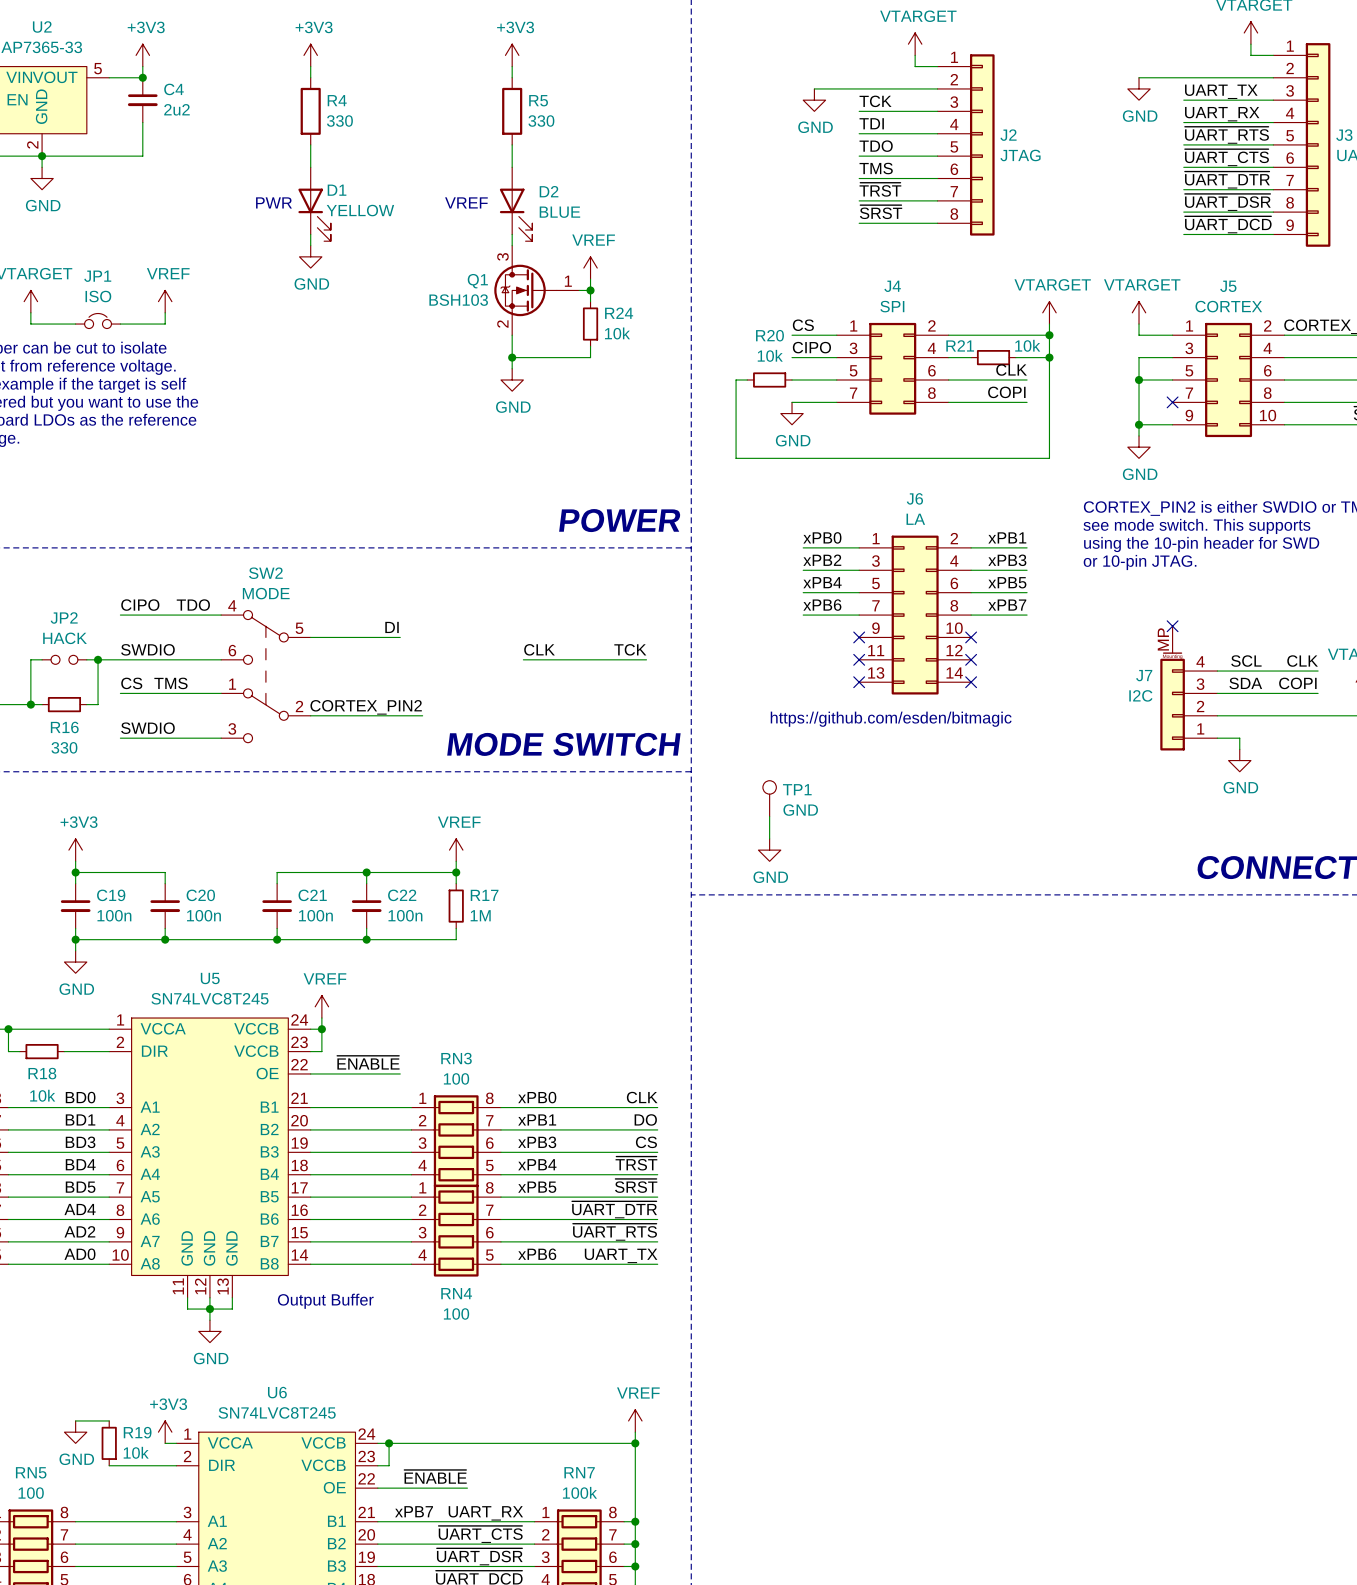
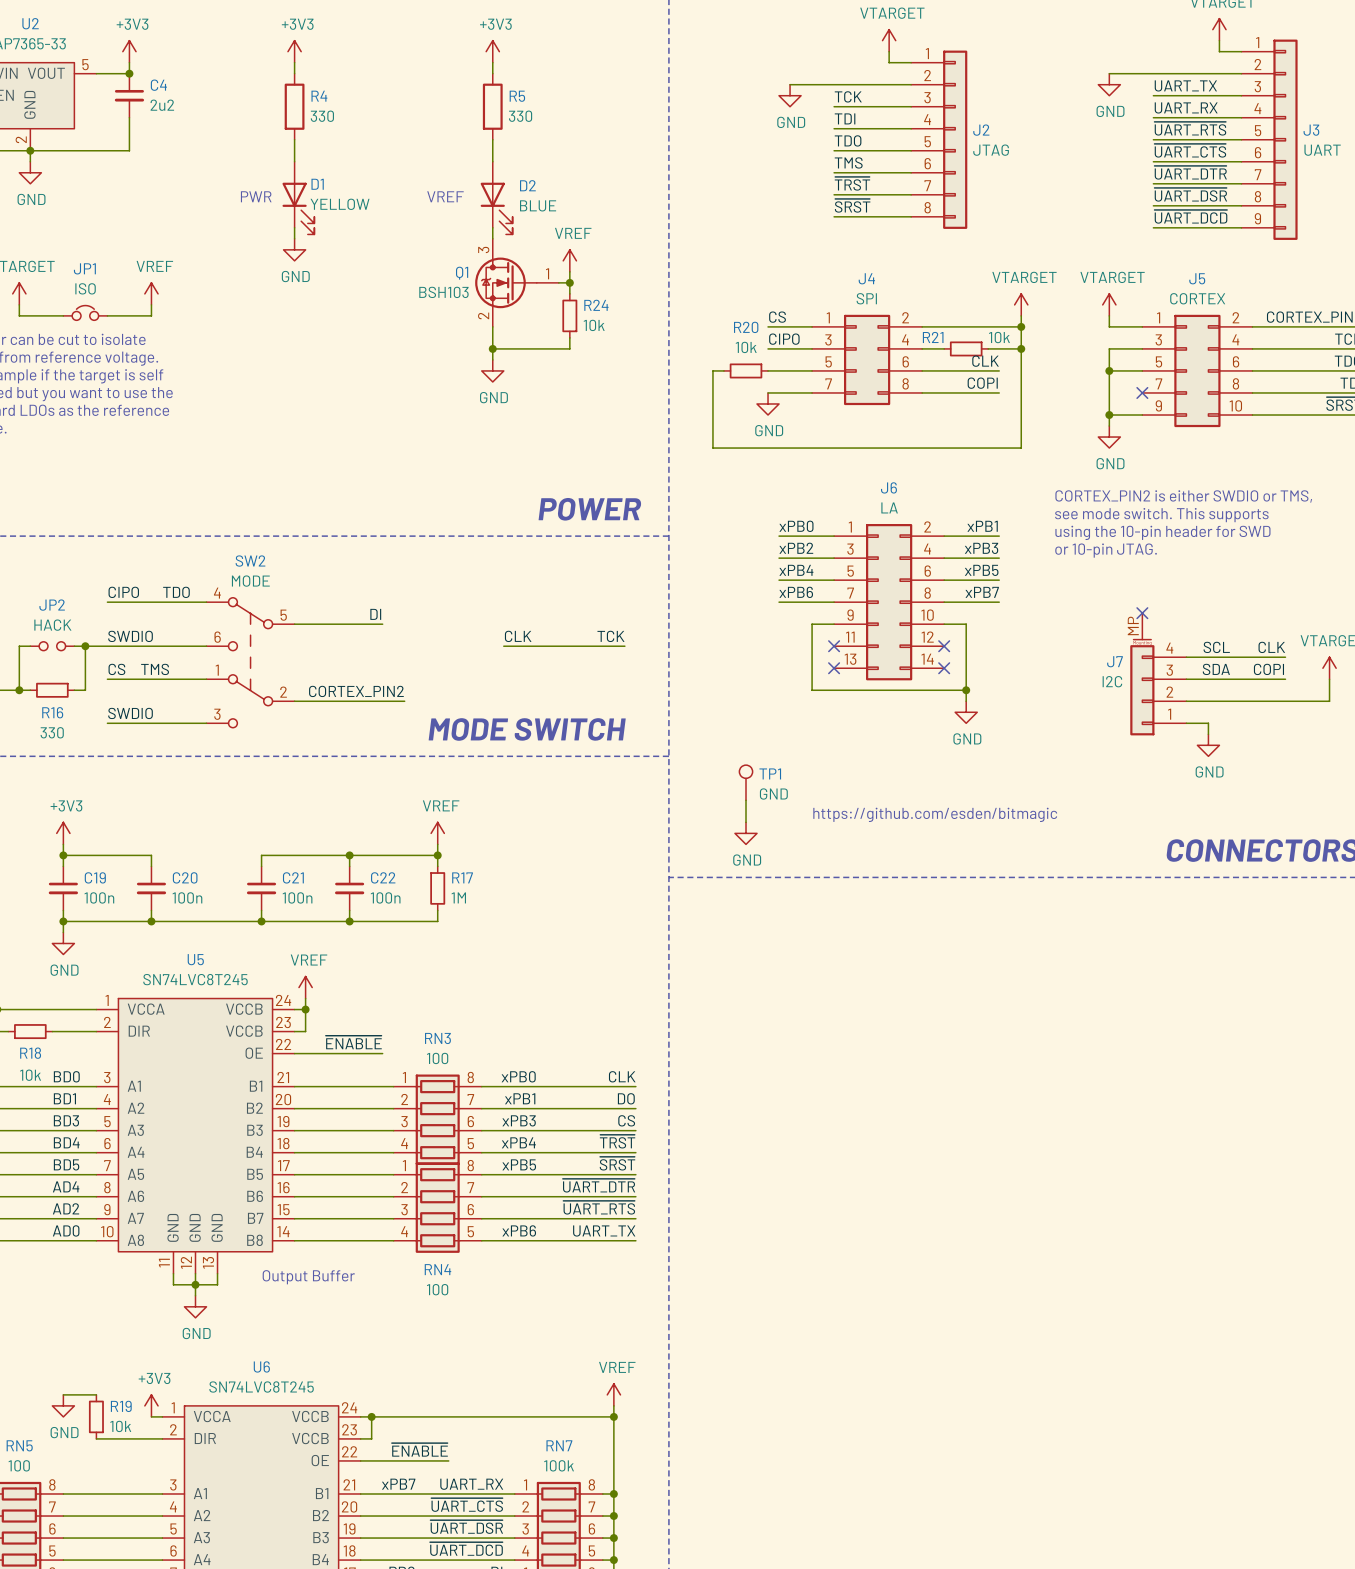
wire: none -> (834, 624) (812, 624) (812, 690) (966, 690)
no-connect mark: (859, 637) -> none
wire: none -> (944, 624) (966, 624) (966, 701)
no-connect mark: (971, 637) -> none
junction: none -> (966, 690)
text position: https://github.com/esden/bitmagic (891, 719) -> https://github.com/esden/bitmagic (935, 814)
power symbol: none -> GND (966, 712)

